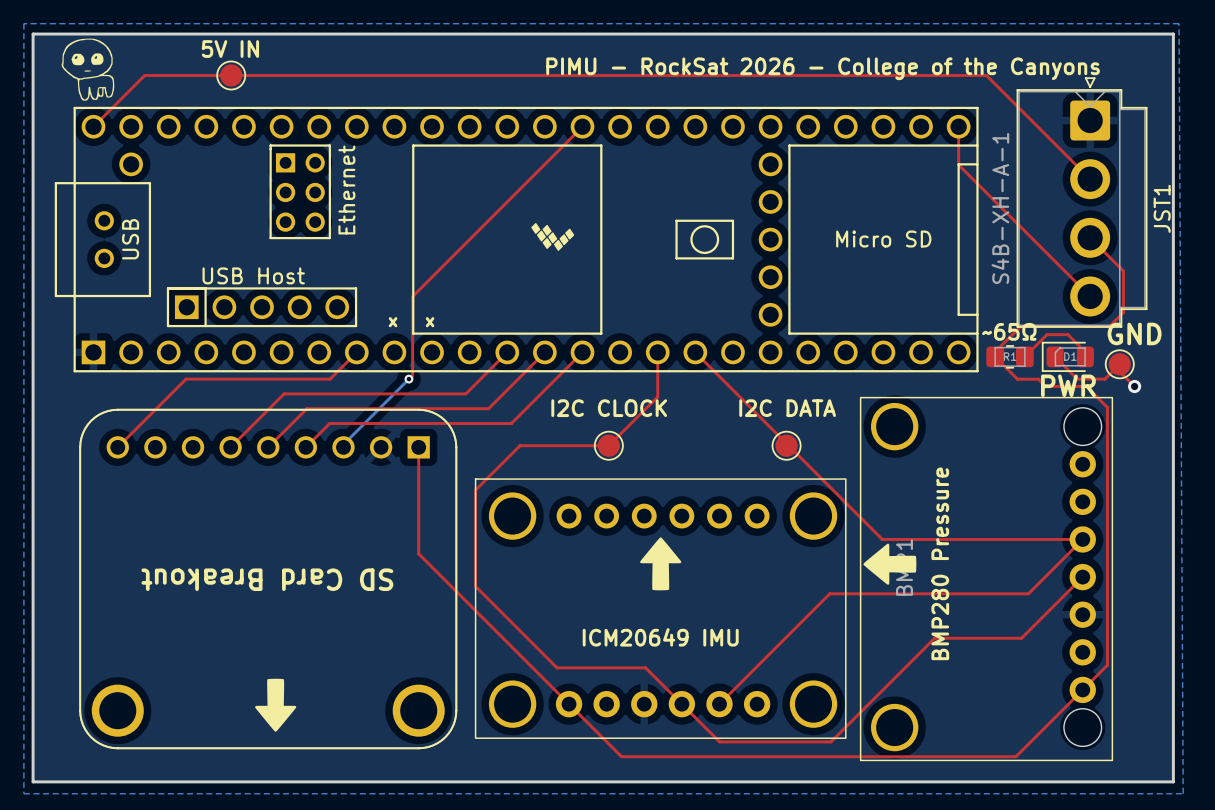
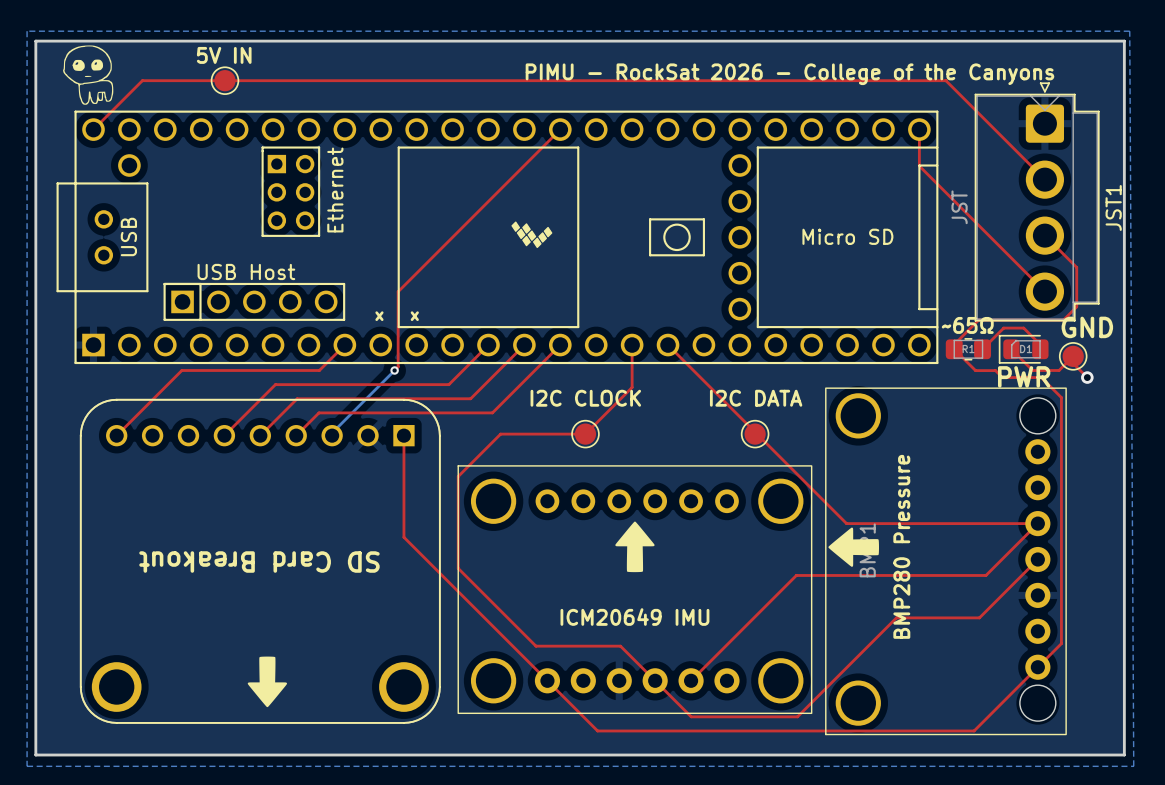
JST1 value: S4B-XH-A-1 (1000, 208) -> JST (959, 207)

